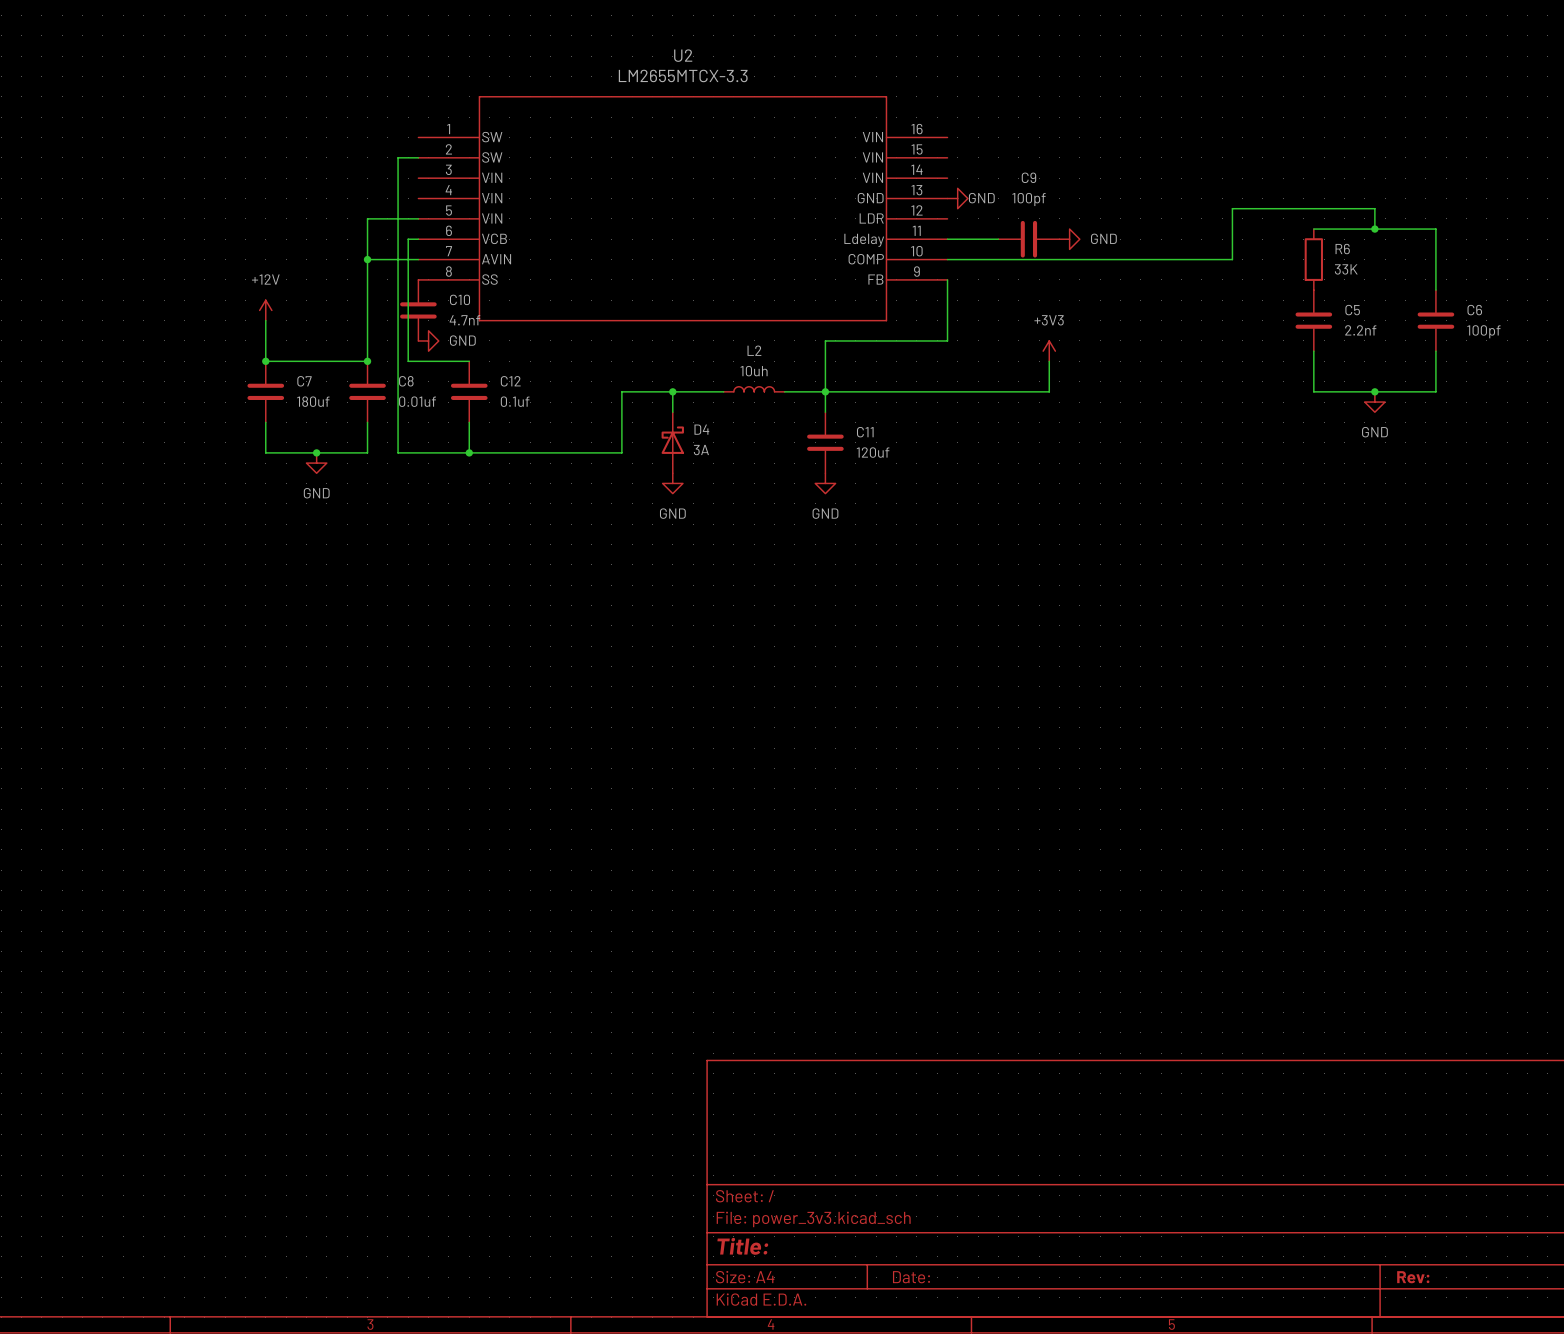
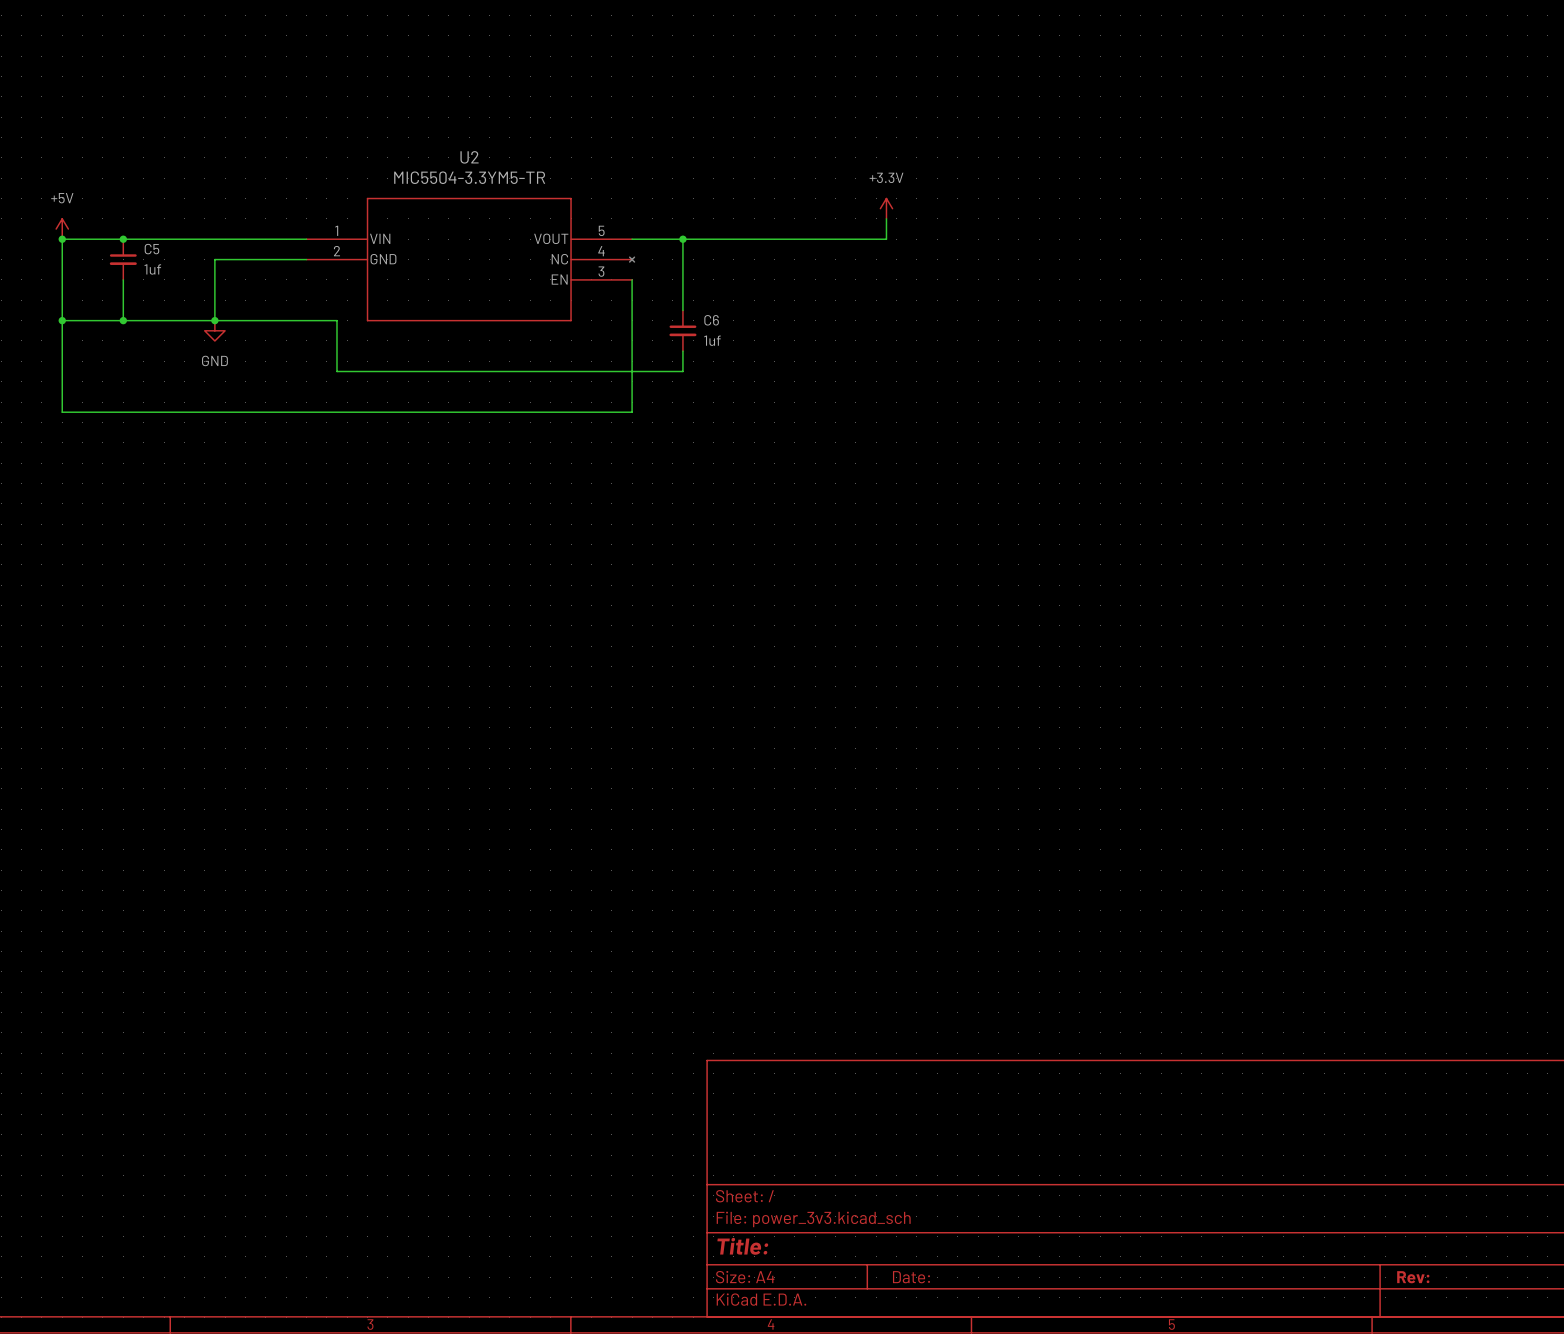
U2 name position: U2 (683, 55) -> U2 (469, 157)
U2 value: LM2655MTCX-3.3 (683, 75) -> MIC5504-3.3YM5-TR (469, 177)
U2 symbol: [418, 96, 948, 322] -> [306, 198, 635, 322]
wire: (418, 157) (398, 157) (398, 452) (621, 452) (621, 391) (723, 391) -> none
power symbol: GND (957, 198) -> none
power symbol: none -> +3.3V (886, 208)
wire: (418, 218) (367, 218) (367, 361) (265, 361) (265, 320) -> none
wire: none -> (886, 218) (886, 239) (632, 239)
power symbol: none -> +5V (62, 229)
wire: (1313, 229) (1435, 229) (1435, 290) -> none
wire: (1374, 229) (1374, 208) (1232, 208) (1232, 259) (947, 259) -> none
junction: (1374, 229) -> none
junction: none -> (62, 239)
junction: none -> (123, 239)
wire: none -> (306, 239) (62, 239) (62, 412) (632, 412) (632, 279)
wire: (418, 239) (408, 239) (408, 361) (469, 361) -> none
wire: none -> (682, 239) (682, 310)
junction: none -> (682, 239)
wire: (947, 239) (998, 239) -> none
C9: 100pf (1028, 239) -> none
power symbol: GND (1069, 239) -> none
wire: none -> (306, 259) (214, 259) (214, 320)
wire: (367, 259) (418, 259) -> none
junction: (367, 259) -> none
R6: 33K (1313, 259) -> none
wire: none -> (123, 279) (123, 320)
wire: (947, 279) (947, 340) (825, 340) (825, 412) -> none
C5 symbol: [1295, 290, 1333, 352] -> [109, 239, 137, 280]
C6 symbol: [1417, 290, 1455, 352] -> [669, 310, 697, 352]
power symbol: +12V (265, 310) -> none
C10: 4.7nf (418, 310) -> none
wire: none -> (62, 320) (336, 320) (336, 371) (682, 371) (682, 351)
junction: none -> (62, 320)
junction: none -> (123, 320)
junction: none -> (214, 320)
power symbol: none -> GND (214, 330)
C5 value: 2.2nf (1360, 330) -> 1uf (152, 269)
C6 value: 100pf (1483, 331) -> 1uf (712, 340)
power symbol: GND (428, 340) -> none
power symbol: +3V3 (1049, 351) -> none
wire: (1313, 351) (1313, 391) (1435, 391) (1435, 351) -> none
junction: (265, 361) -> none
junction: (367, 361) -> none
wire: (1049, 361) (1049, 391) (784, 391) -> none
L2: 10uh (754, 389) -> none
C7: 180uf (265, 391) -> none
C8: 0.01uf (367, 391) -> none
C12: 0.1uf (469, 391) -> none
wire: (672, 391) (672, 412) -> none
junction: (672, 391) -> none
junction: (825, 391) -> none
junction: (1374, 391) -> none
power symbol: GND (1374, 402) -> none
wire: (265, 422) (265, 452) (367, 452) (367, 422) -> none
wire: (469, 422) (469, 452) -> none
D4: 3A (672, 442) -> none
C11: 120uf (825, 442) -> none
junction: (316, 452) -> none
junction: (469, 452) -> none
power symbol: GND (316, 463) -> none
power symbol: GND (672, 483) -> none
power symbol: GND (825, 483) -> none

